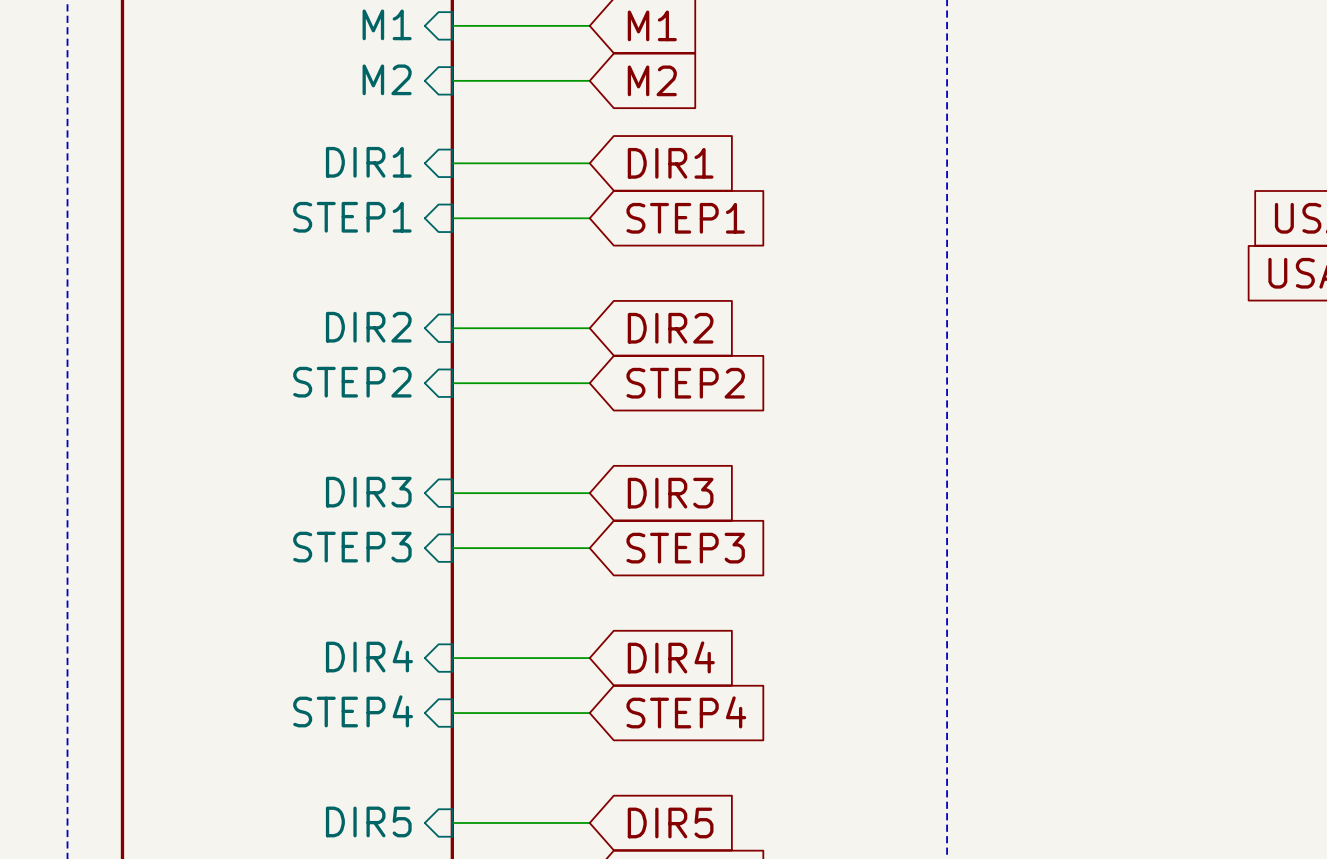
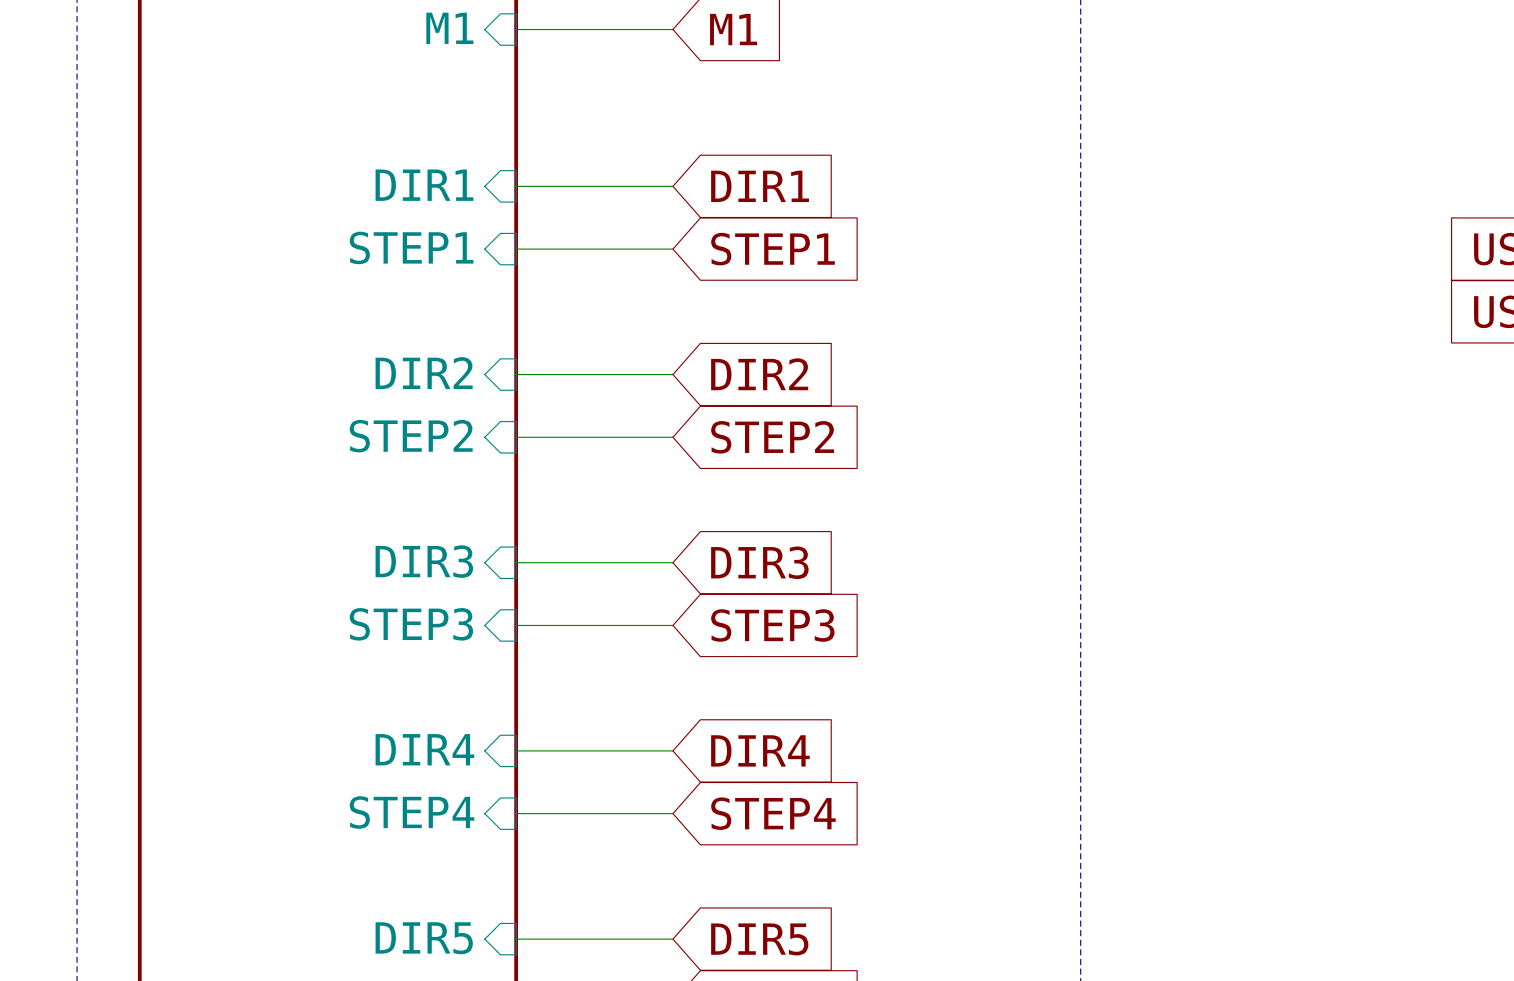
sheet pin: M2 (387, 79) -> none
wire: (452, 80) (589, 80) -> none
global label: M2 (652, 80) -> none

